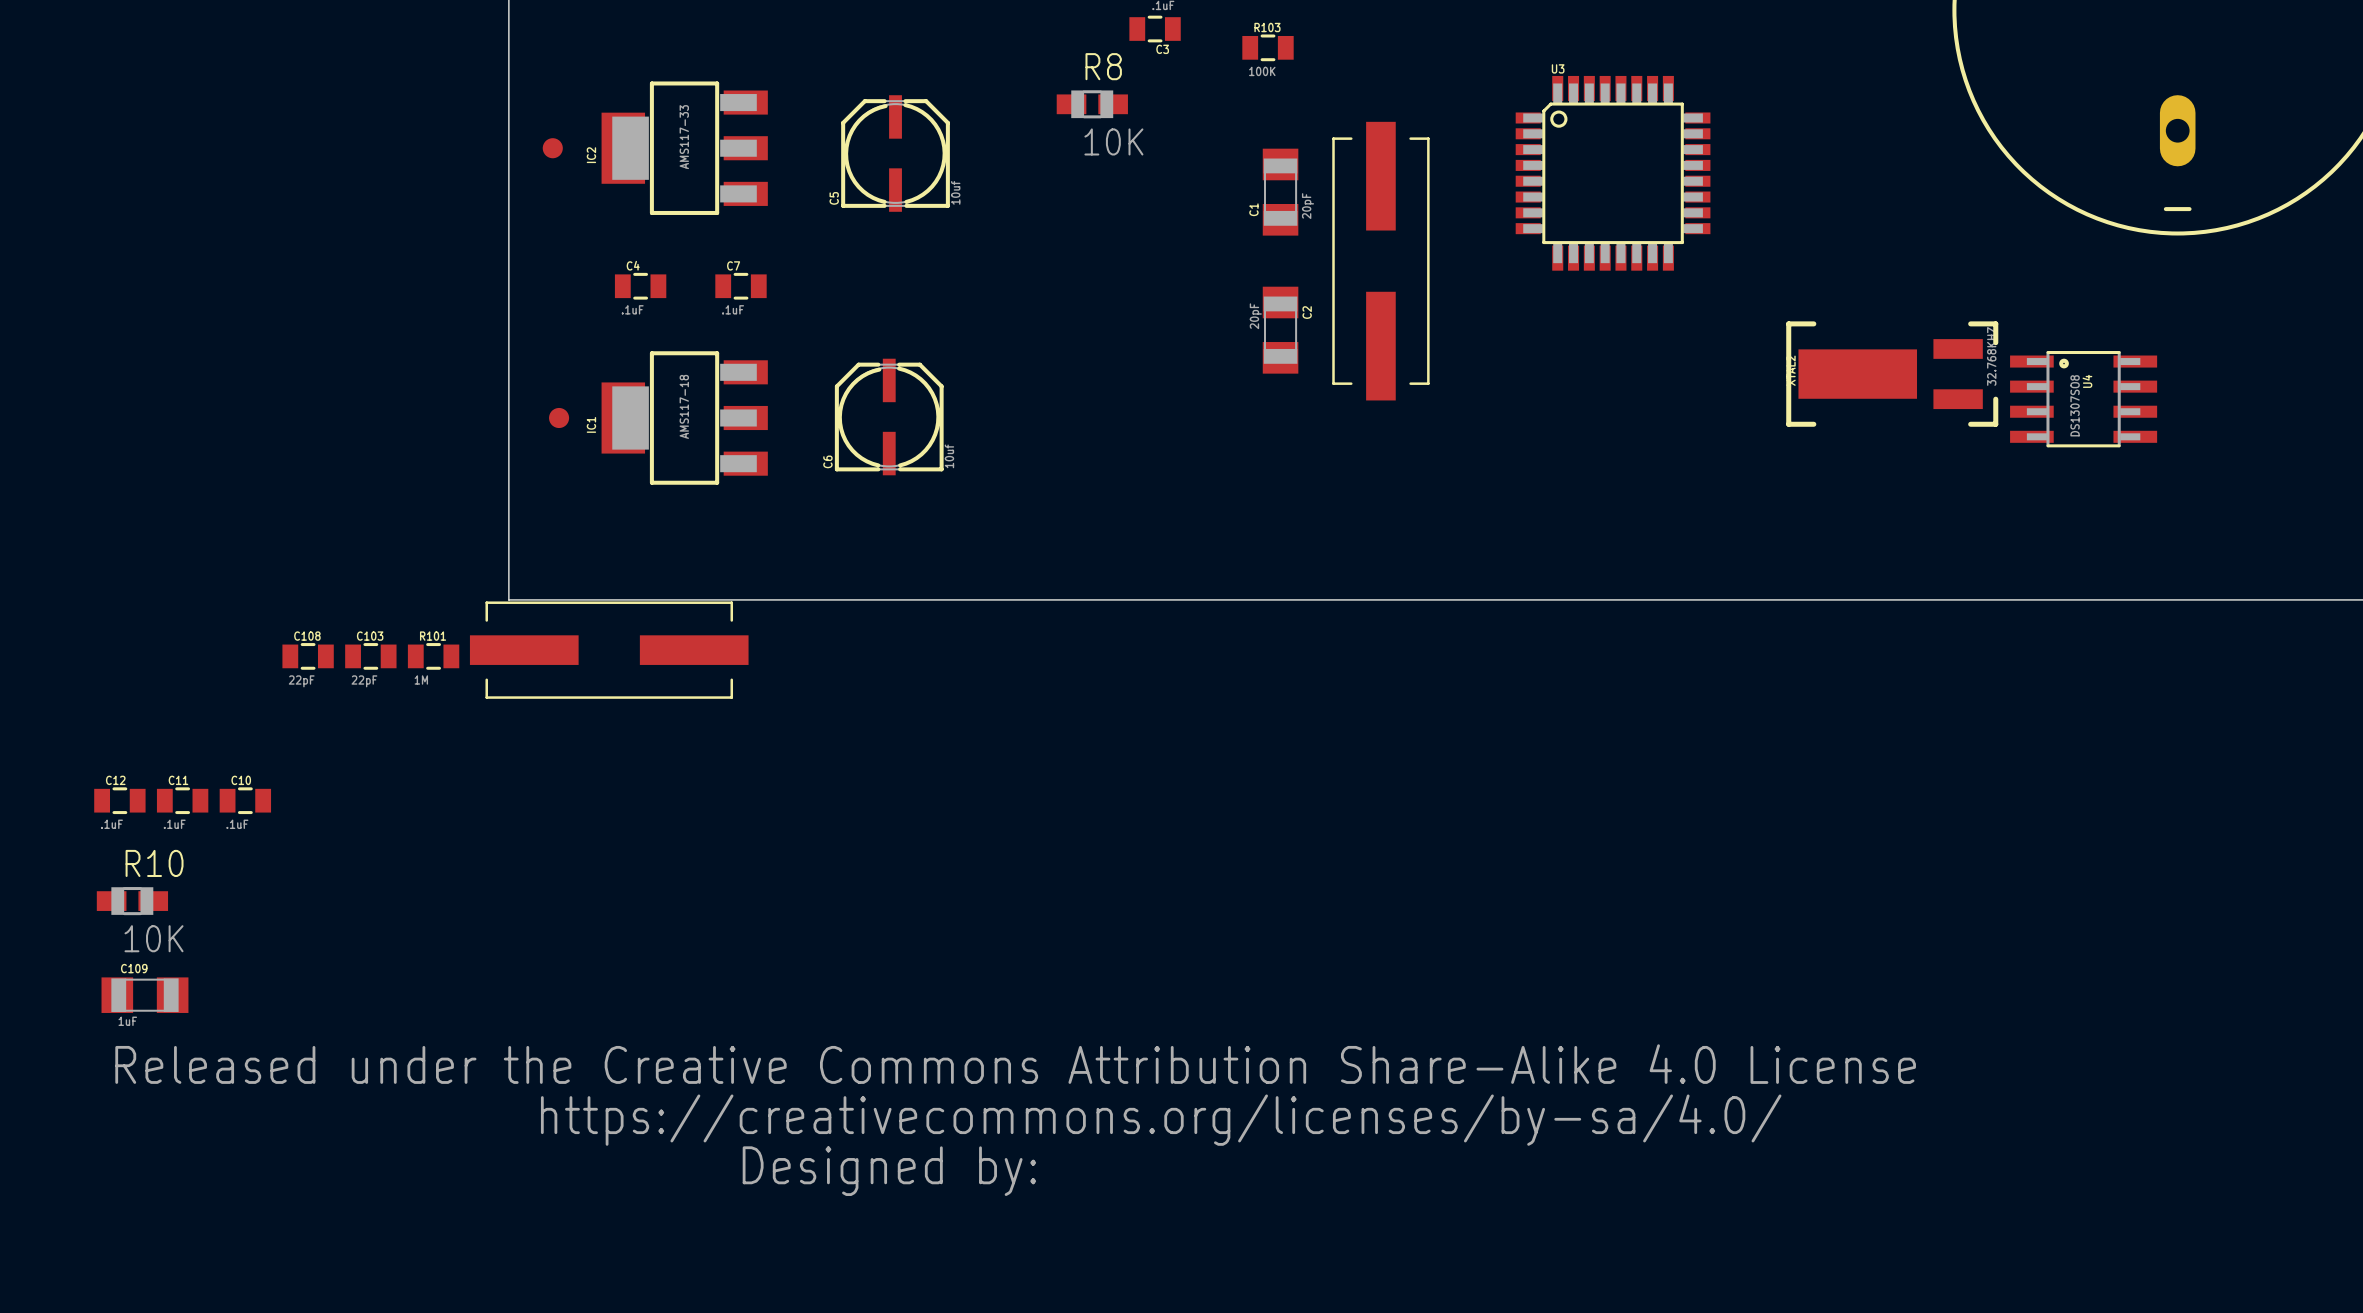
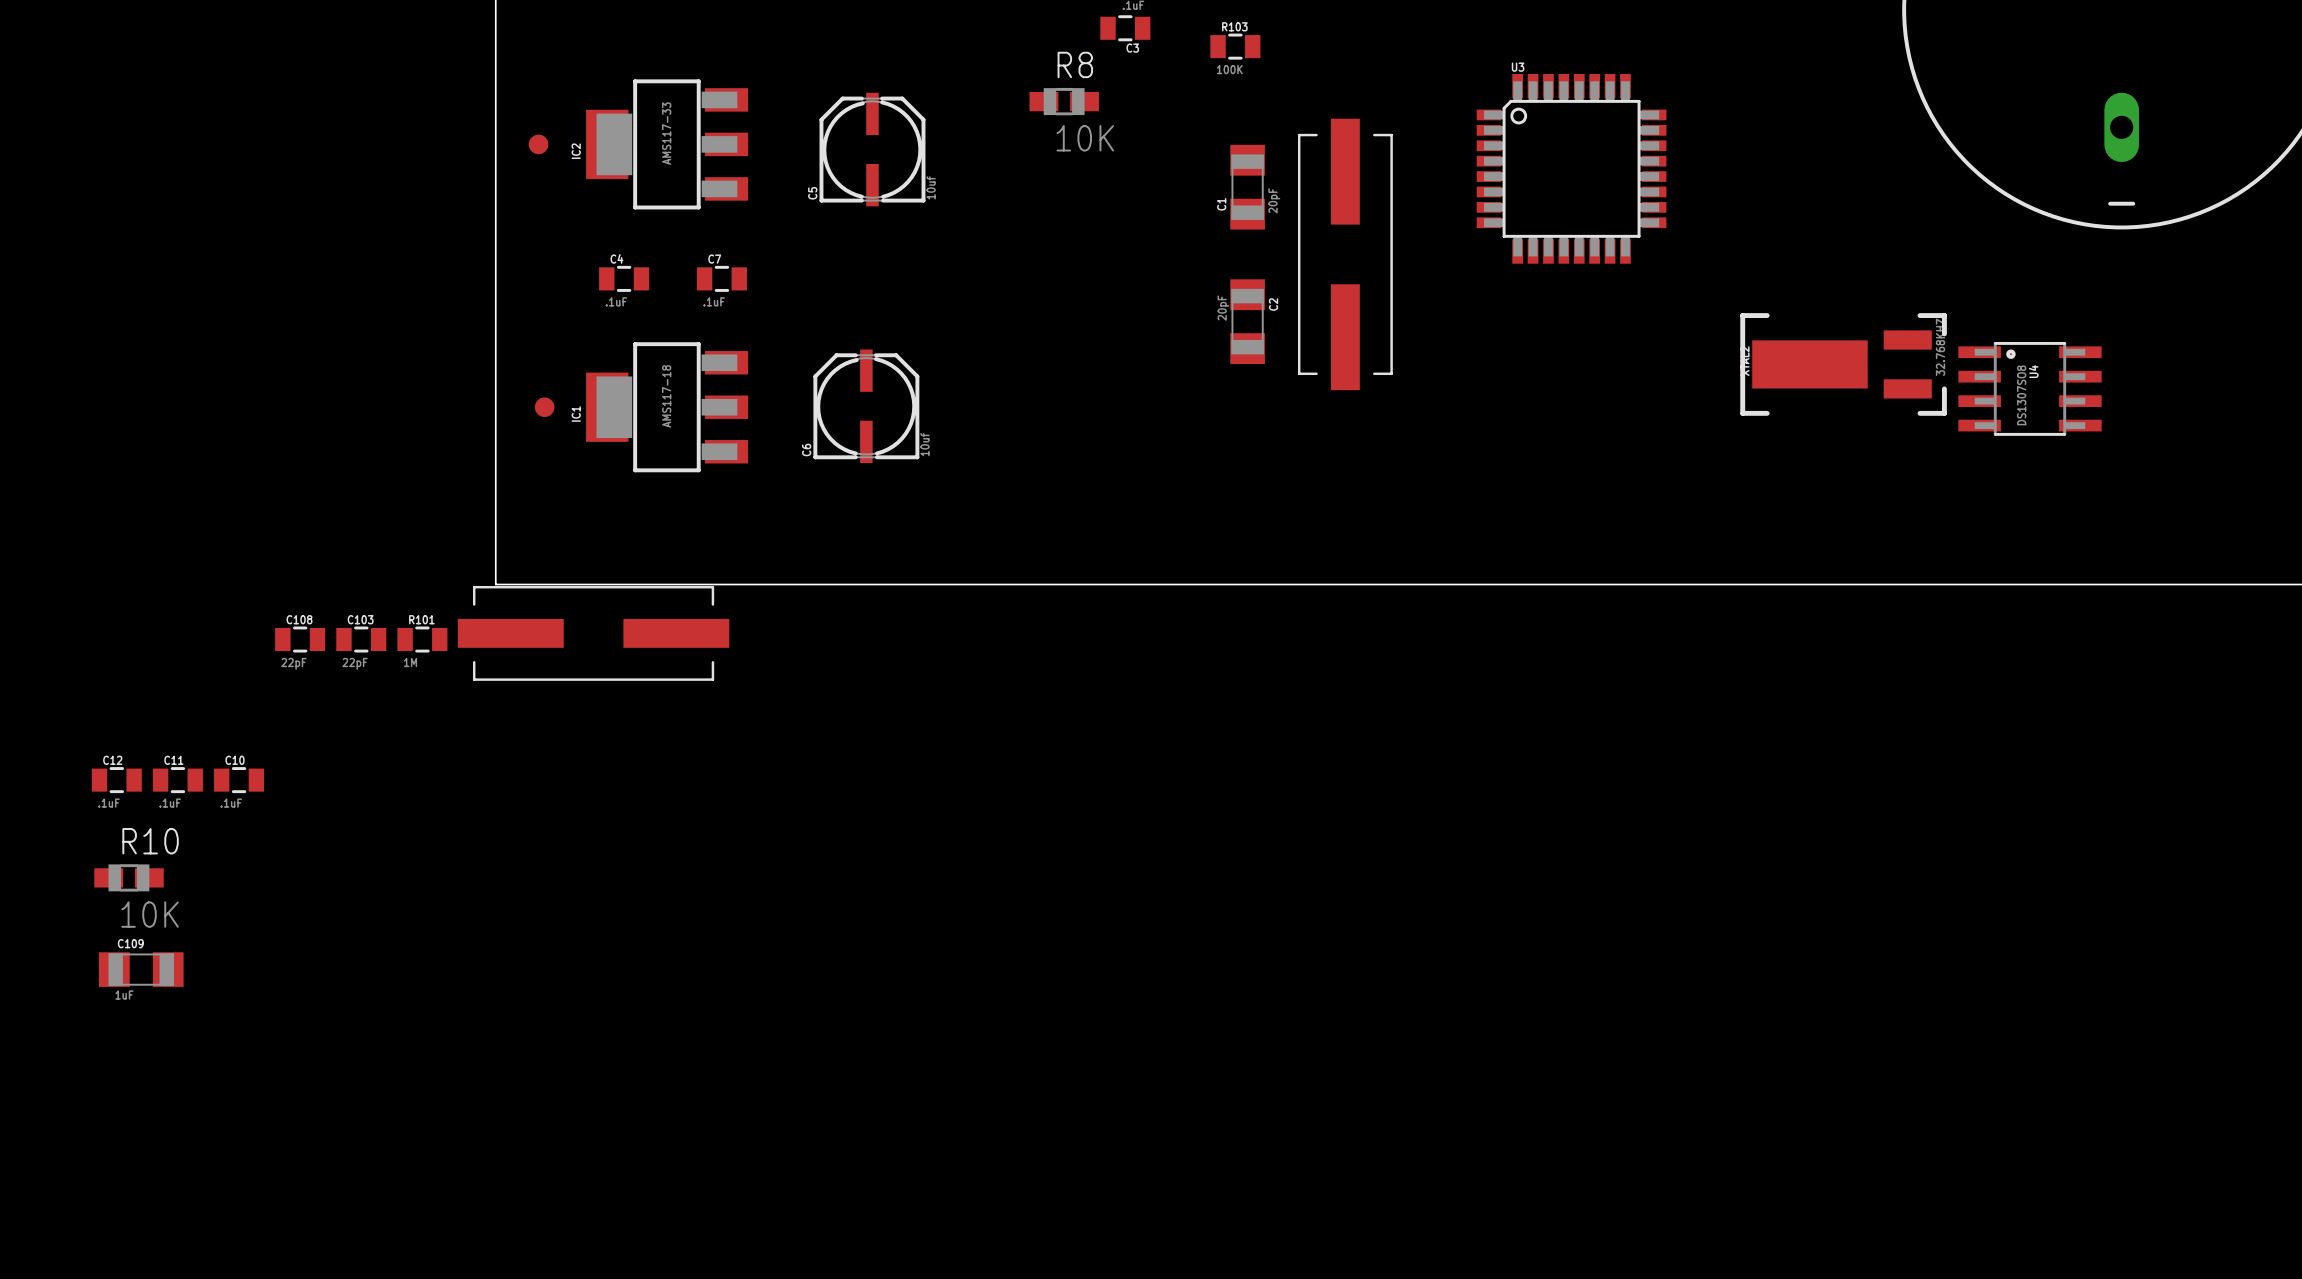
drawing: [115, 1044, 1916, 1196] -> none

